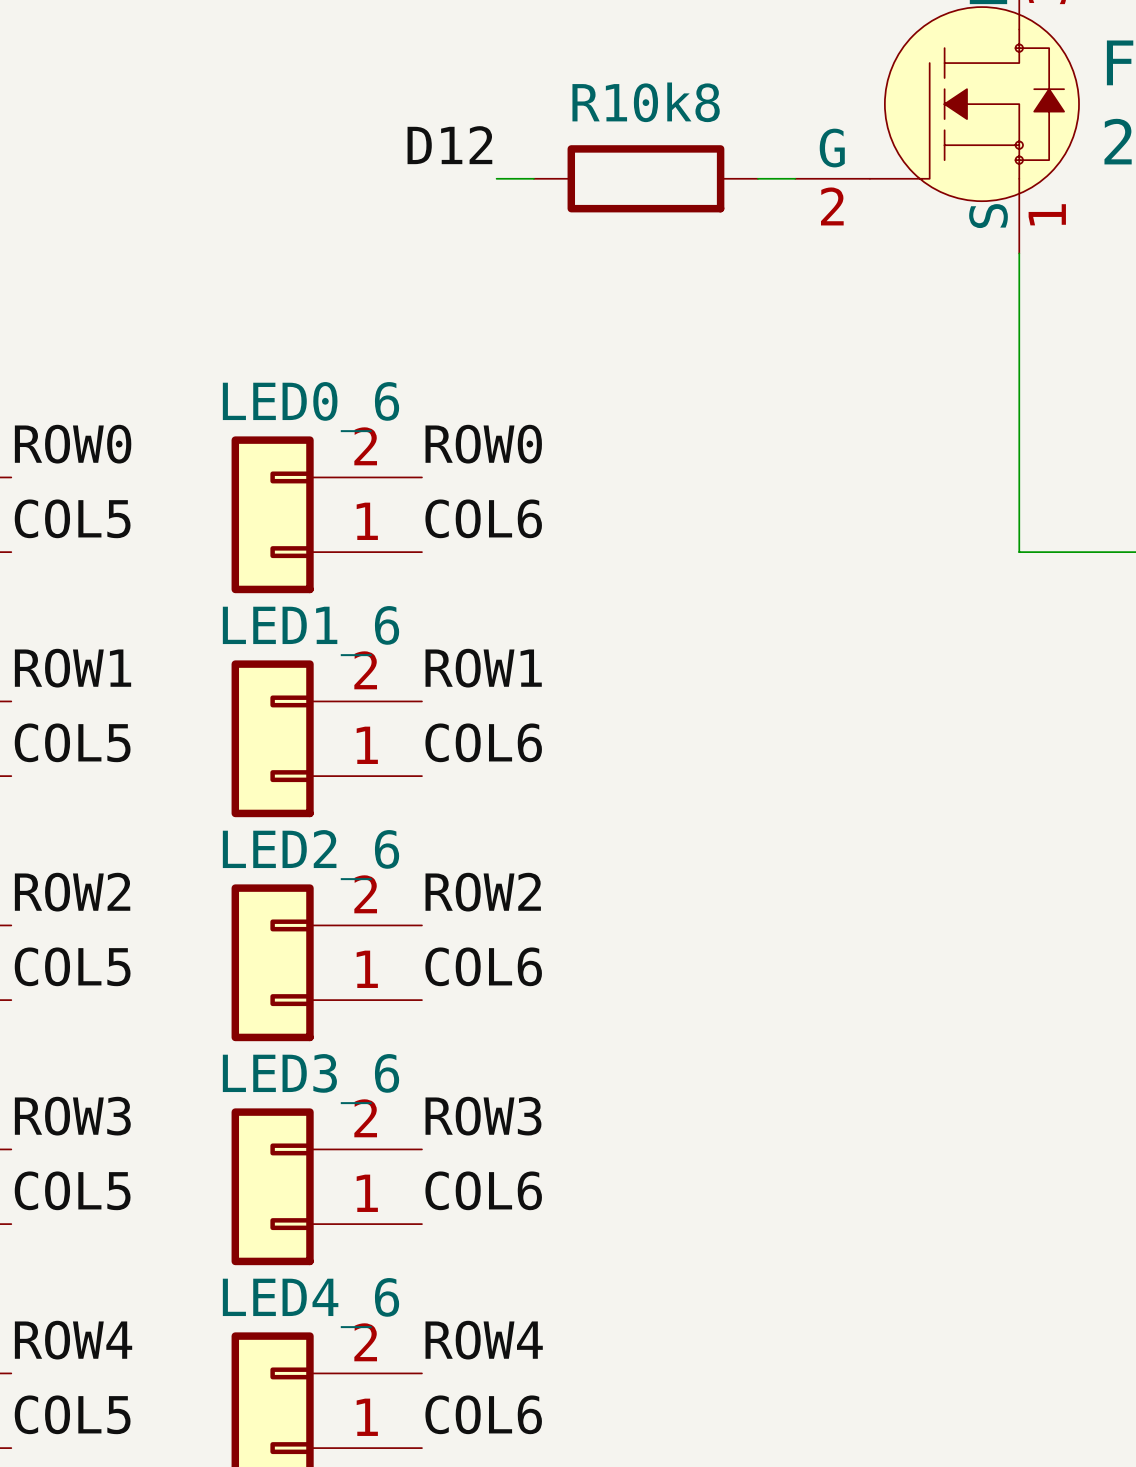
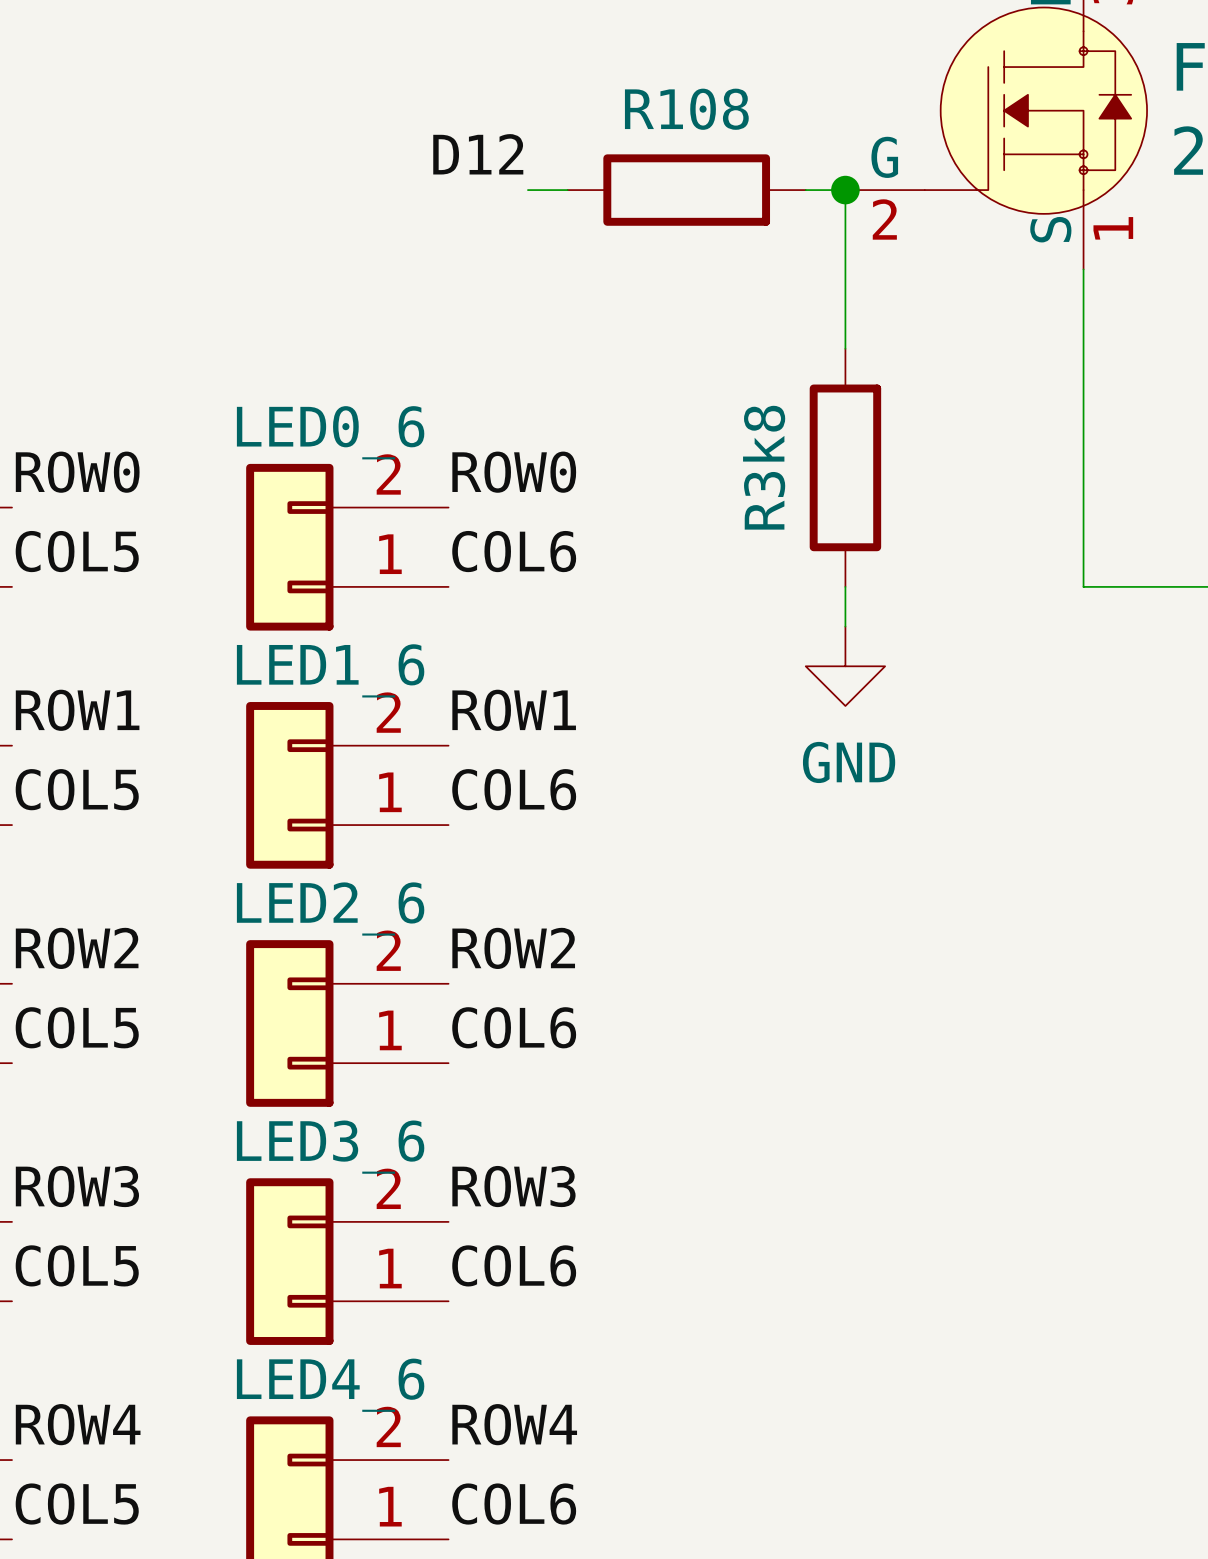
R10k8 name: R10k8 (646, 102) -> R108 (686, 109)
wire: none -> (845, 190) (845, 348)
junction: none -> (845, 190)
R3k8: none -> (845, 467)
wire: none -> (845, 586) (845, 626)
power symbol: none -> GND (845, 666)

